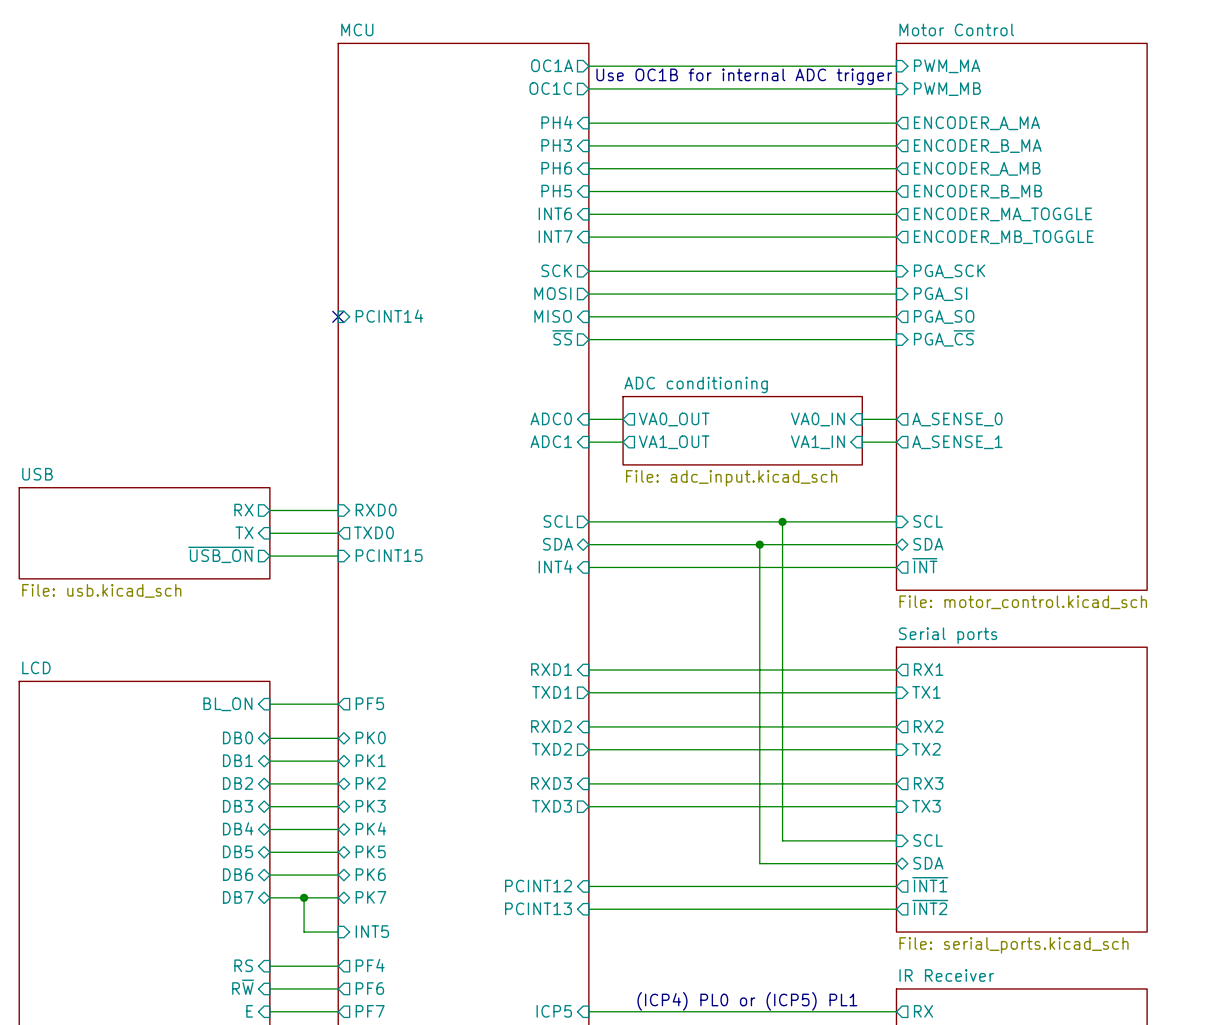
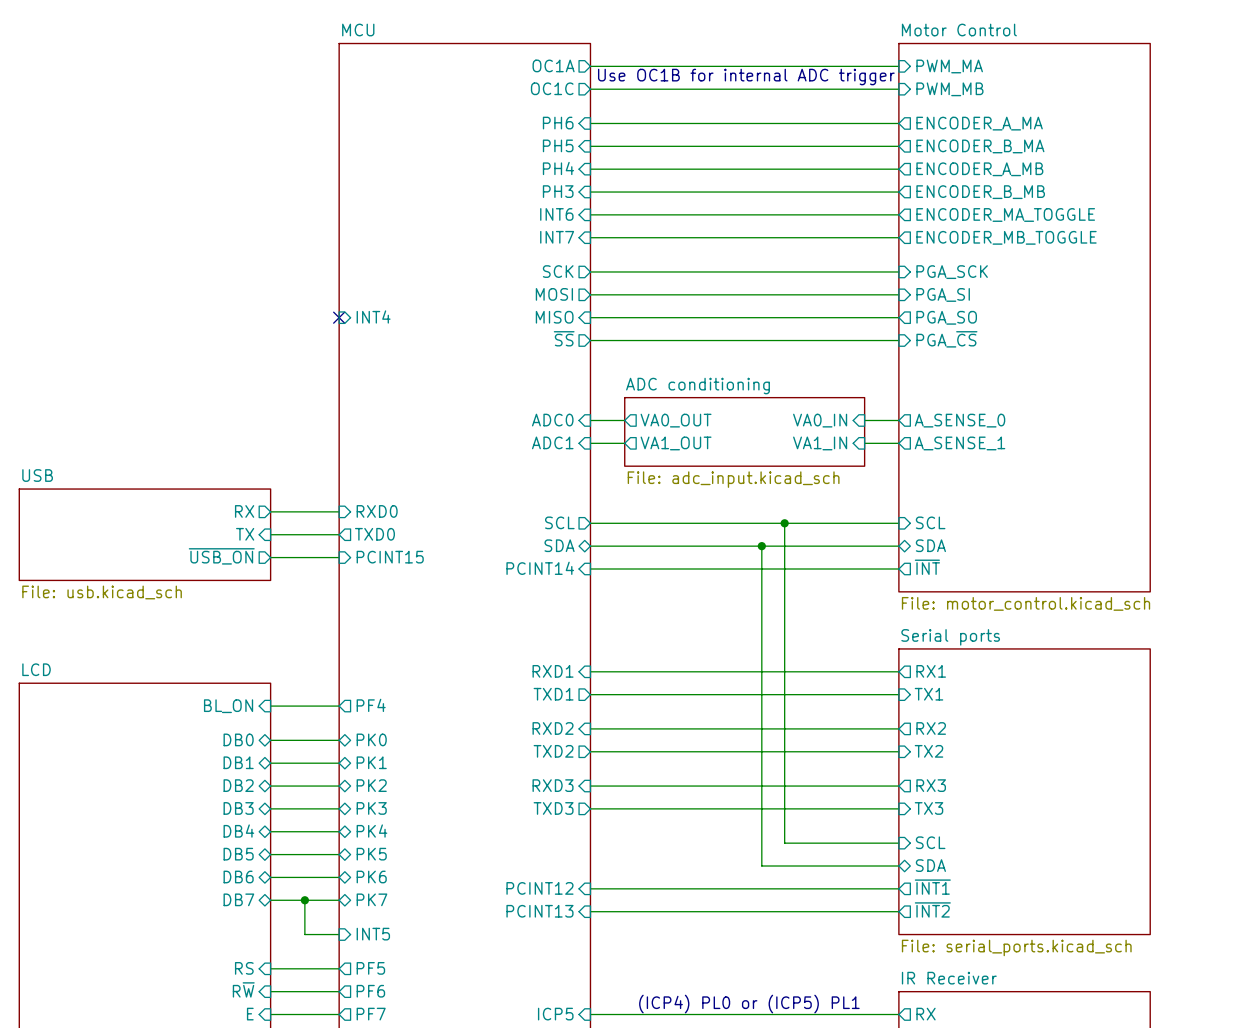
sheet pin: PH4 (556, 122) -> PH6 (558, 123)
sheet pin: PH3 (556, 145) -> PH5 (558, 145)
sheet pin: PH6 (556, 168) -> PH4 (558, 168)
sheet pin: PH5 (556, 191) -> PH3 (558, 191)
sheet pin: PCINT14 (389, 316) -> INT4 (373, 316)
sheet pin: INT4 (555, 566) -> PCINT14 (540, 568)
sheet pin: PF5 (369, 703) -> PF4 (371, 705)
sheet pin: PF4 (370, 965) -> PF5 (370, 968)

